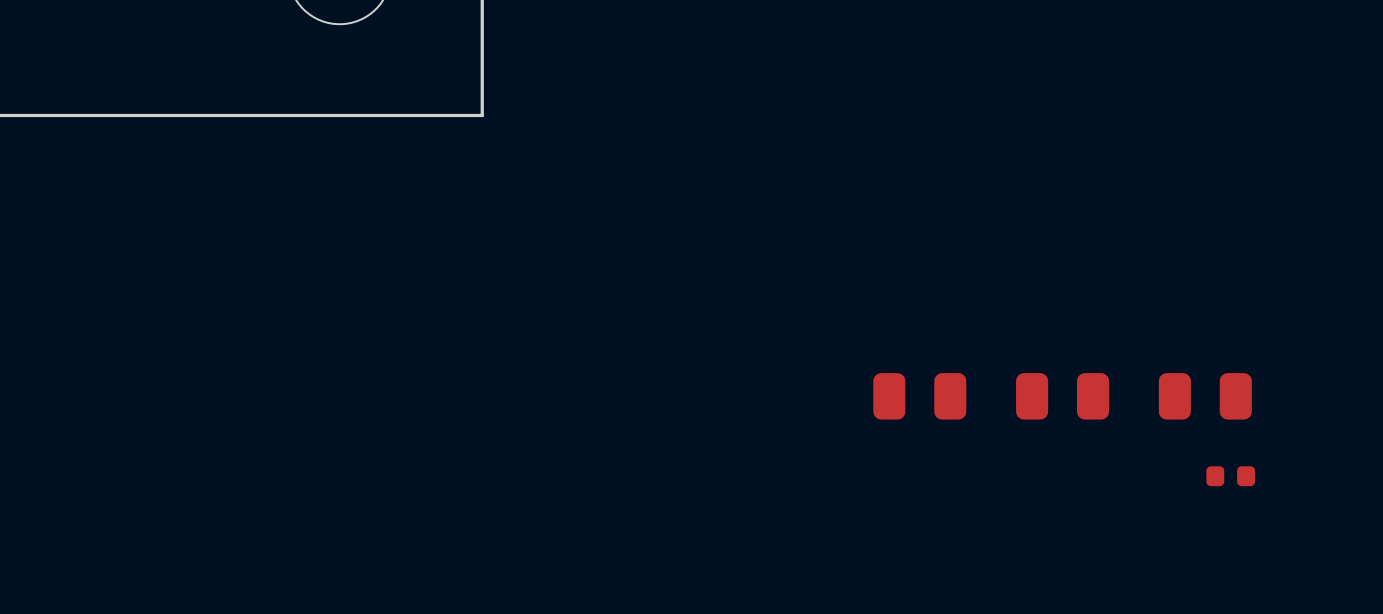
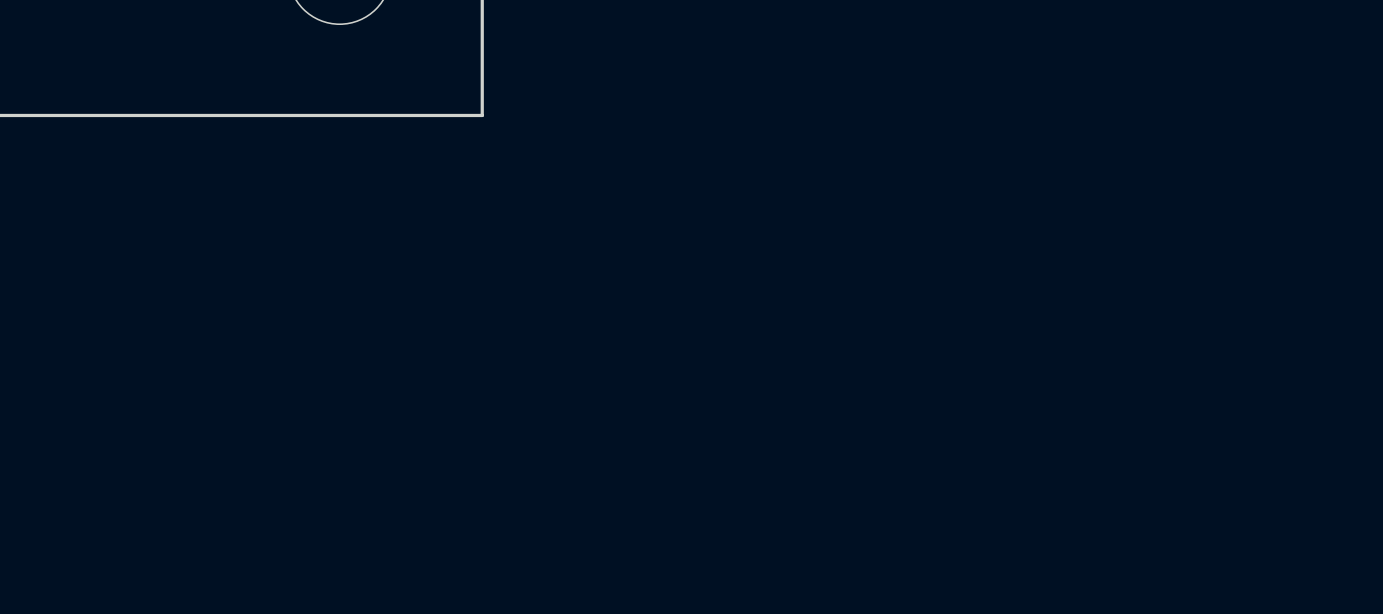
part: (919, 396) -> none
part: (1062, 396) -> none
part: (1205, 396) -> none
part: (1230, 476) -> none

